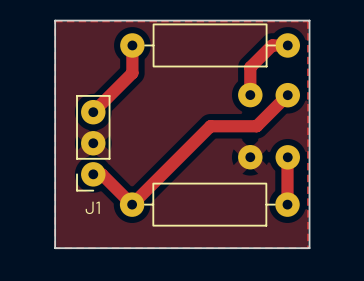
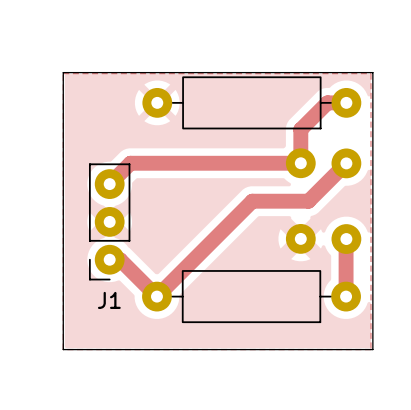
top track: (132, 45) (132, 73) (110, 95) -> (300, 163) (130, 163)

